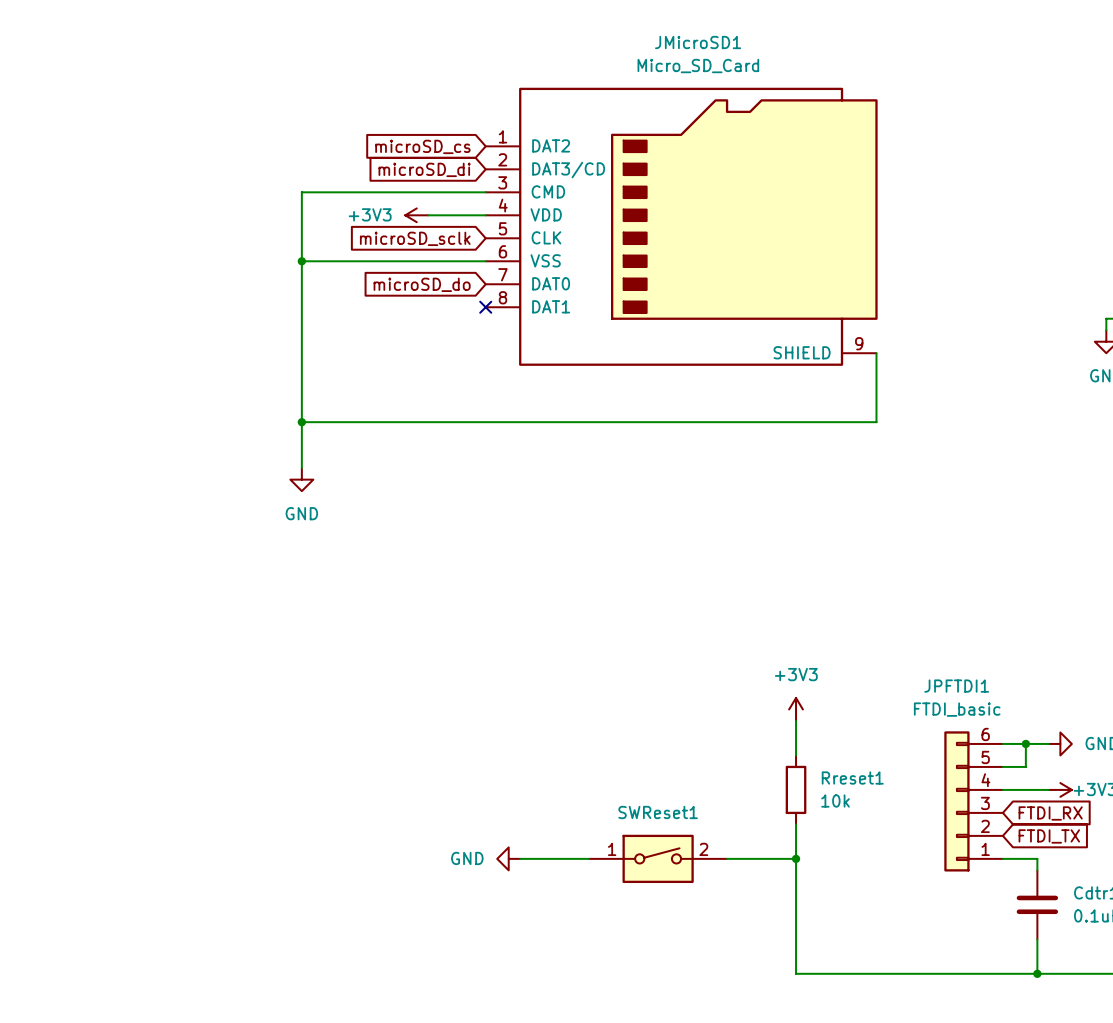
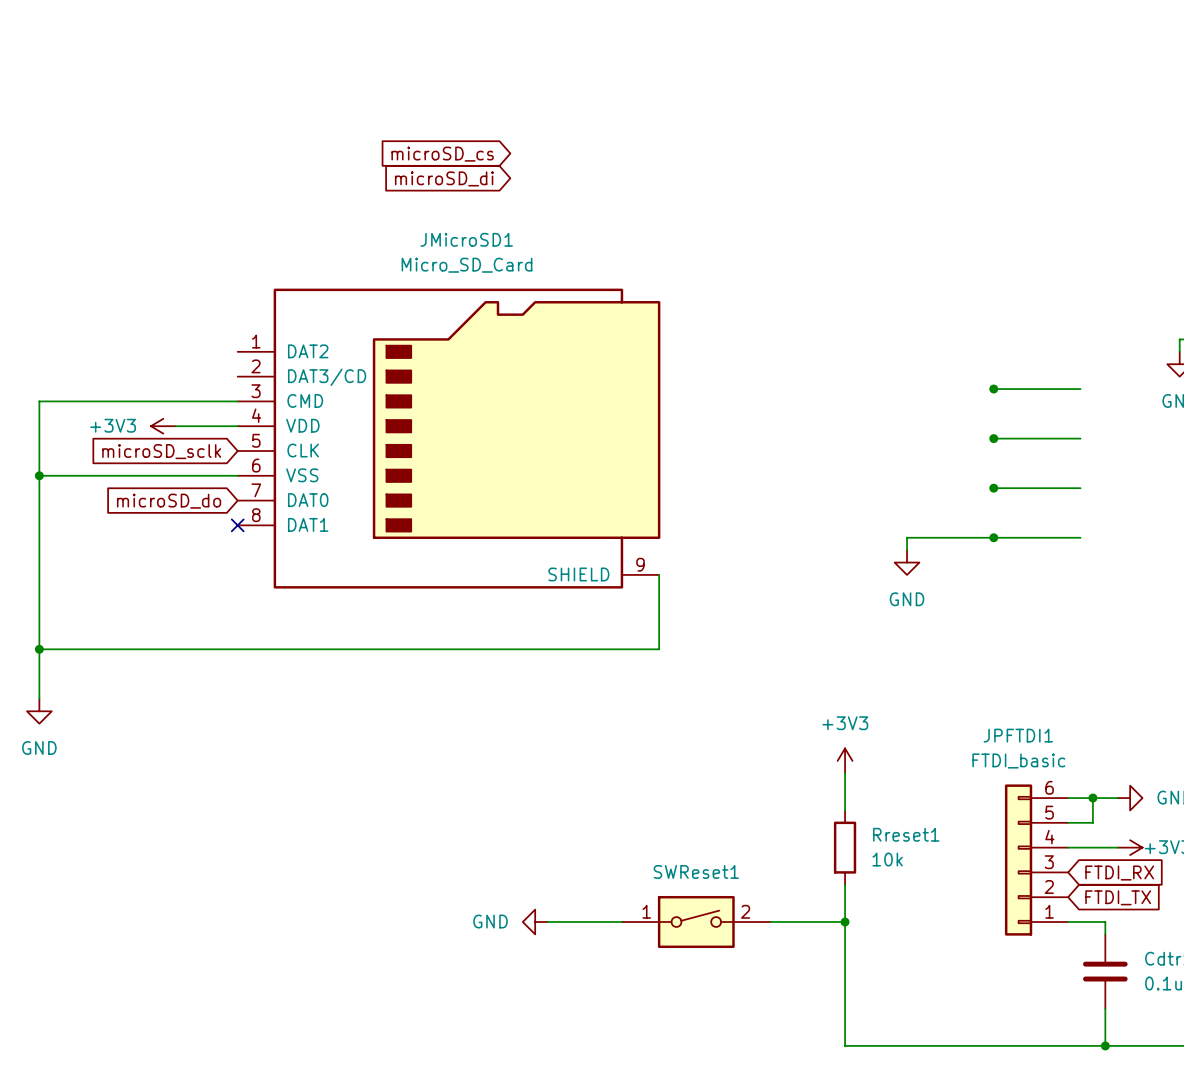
wire: (485, 192) (301, 192) (301, 468) -> none
power symbol: +3V3 (416, 215) -> none
wire: (428, 215) (485, 215) -> none
JMicroSD1 position: (681, 226) -> (449, 438)
global label: microSD_sclk (415, 238) -> none
wire: (301, 261) (485, 261) -> none
junction: (301, 261) -> none
global label: microSD_do (422, 284) -> none
no-connect mark: (485, 307) -> none
wire: (876, 353) (876, 422) (301, 422) -> none
wire: none -> (993, 389) (1080, 389)
junction: none -> (993, 389)
wire: none -> (237, 401) (39, 401) (39, 698)
power symbol: none -> +3V3 (163, 426)
wire: none -> (175, 426) (237, 426)
wire: none -> (993, 438) (1080, 438)
junction: none -> (993, 438)
global label: none -> microSD_sclk (161, 451)
junction: (301, 422) -> none
wire: none -> (39, 475) (237, 475)
junction: none -> (39, 475)
wire: none -> (993, 488) (1080, 488)
junction: none -> (993, 488)
global label: none -> microSD_do (169, 501)
power symbol: GND (301, 479) -> none
no-connect mark: none -> (237, 525)
junction: none -> (993, 537)
wire: none -> (1080, 537) (907, 537) (907, 550)
power symbol: none -> GND (907, 562)
wire: none -> (659, 574) (659, 649) (39, 649)
junction: none -> (39, 649)
power symbol: none -> GND (39, 711)

